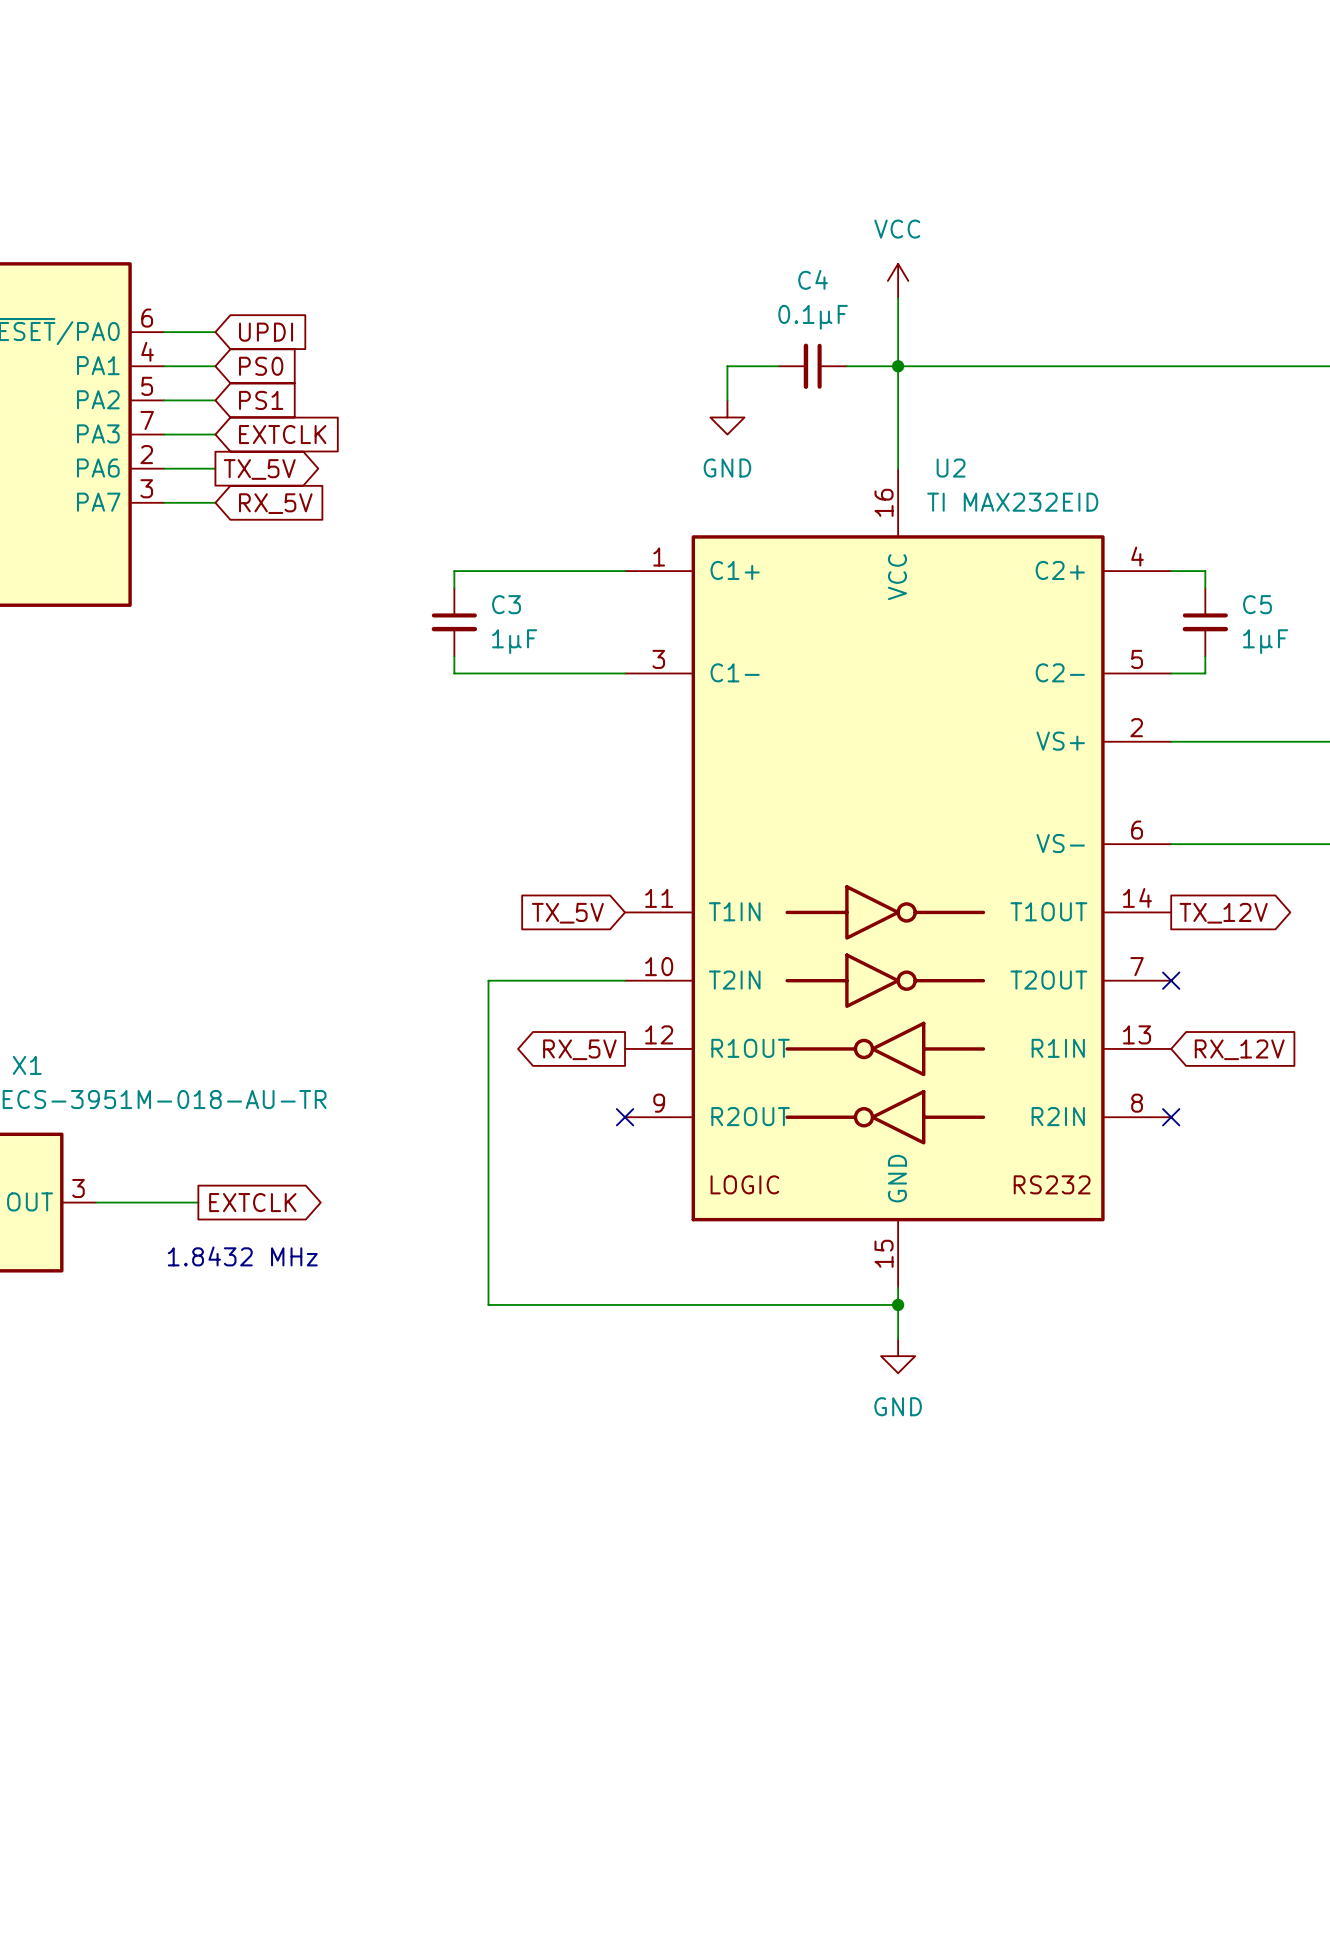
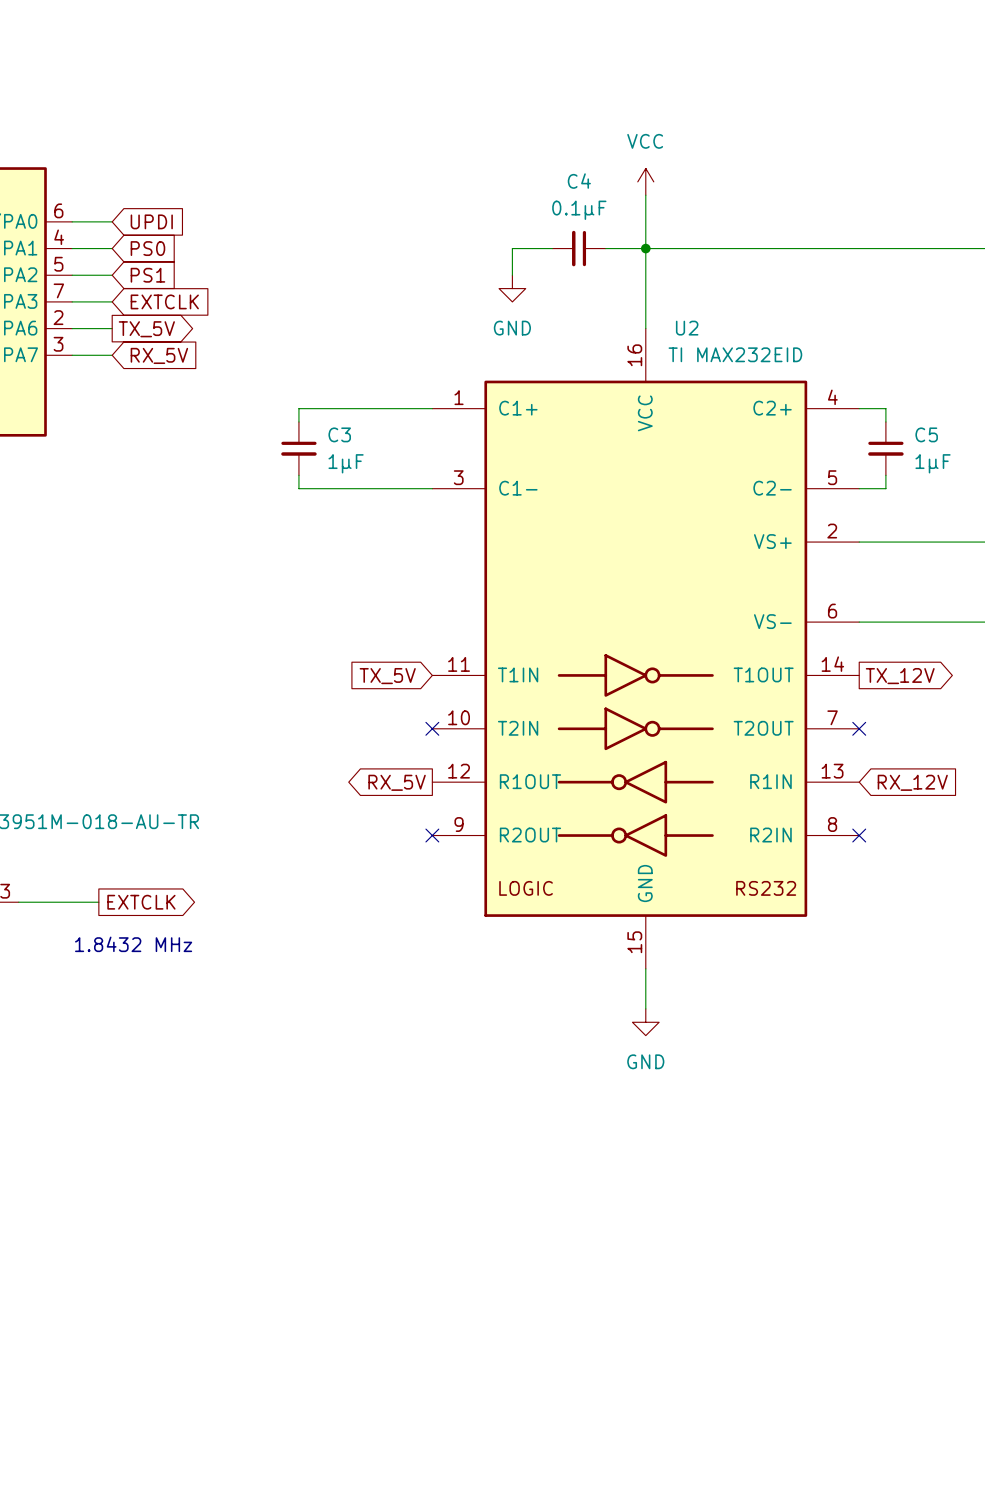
wire: (625, 980) (488, 980) (488, 1304) (898, 1304) -> none
no-connect mark: none -> (432, 728)
junction: (898, 1304) -> none

